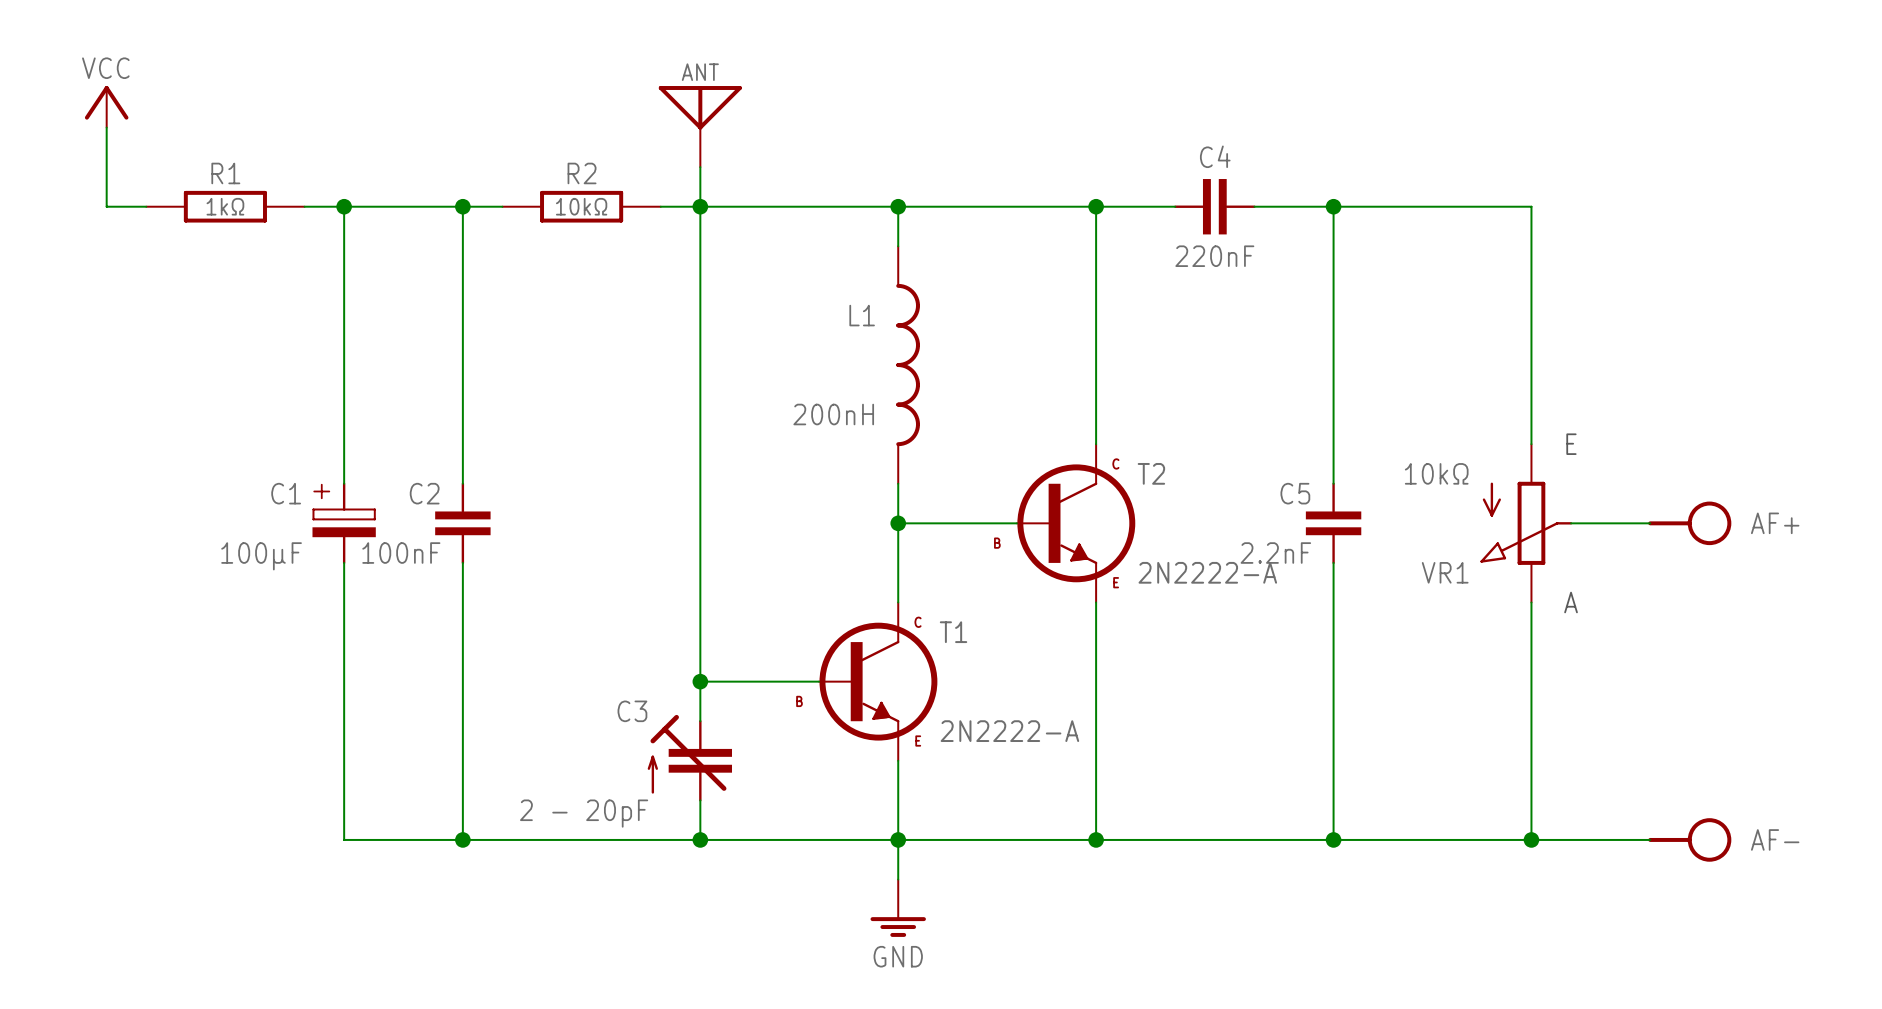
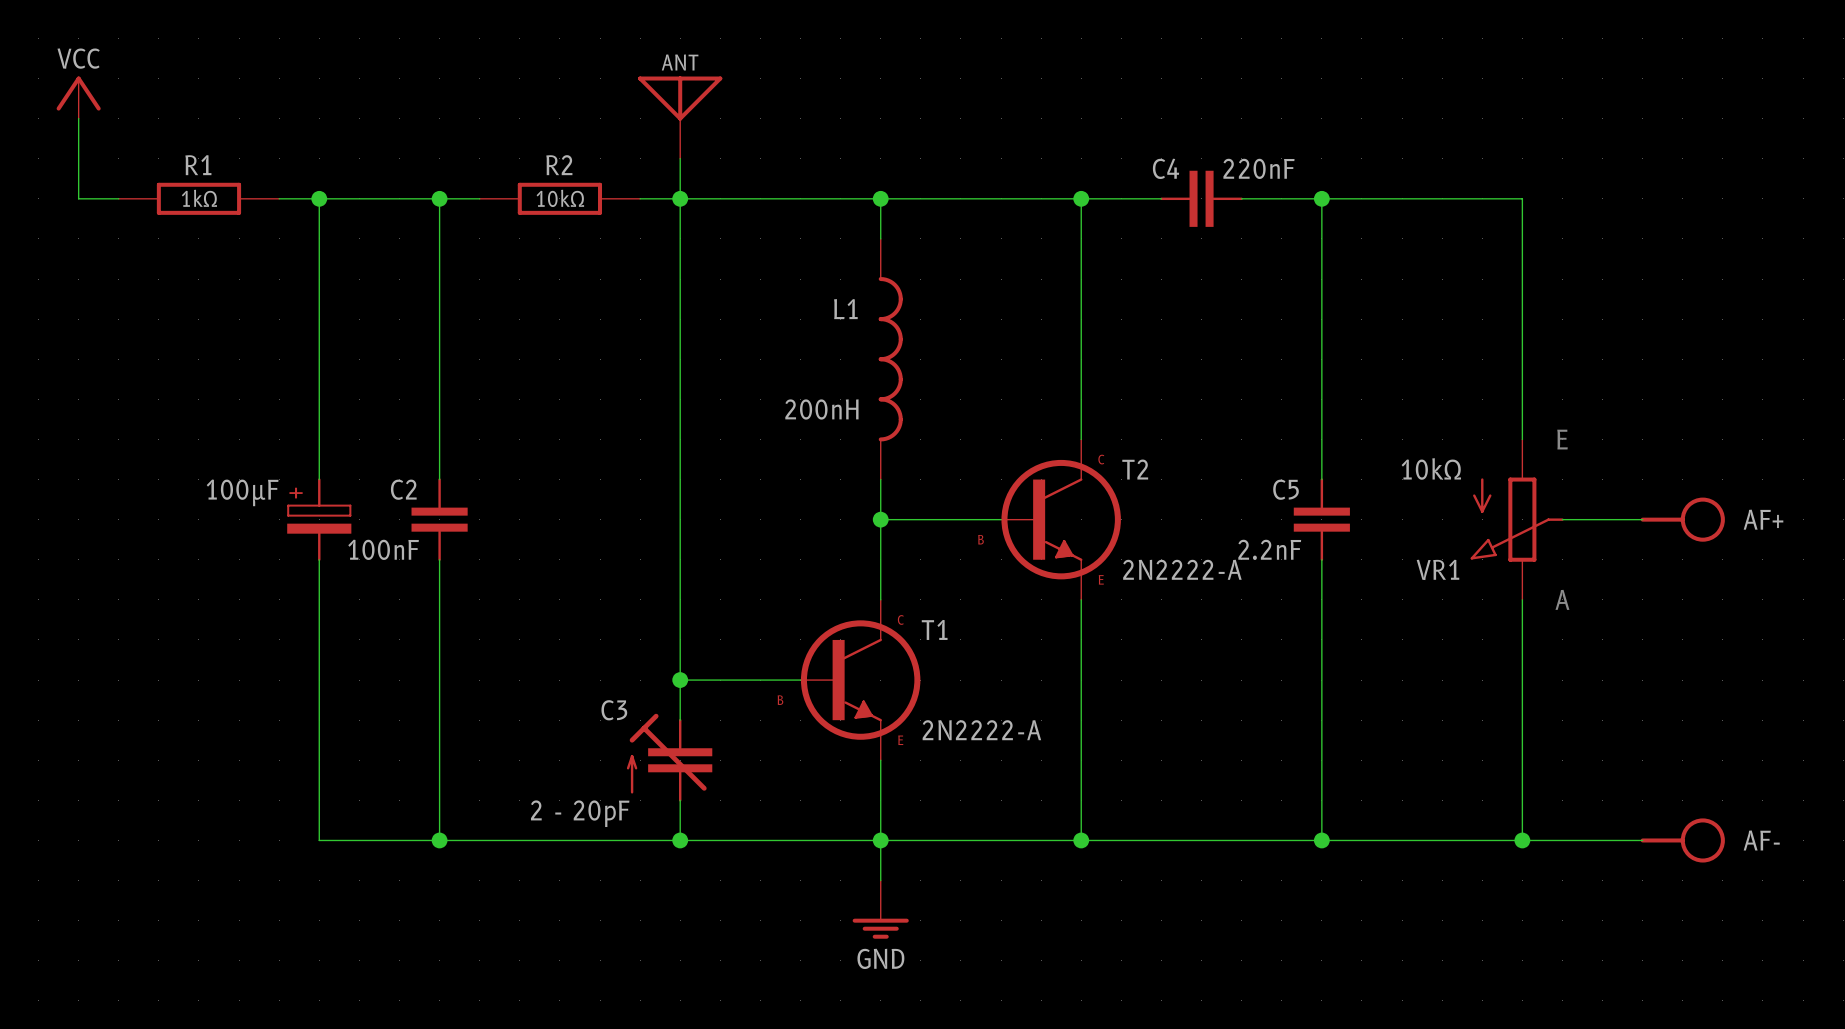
C4 name position: C4 (1215, 156) -> C4 (1166, 168)
C4 value position: 220nF (1214, 256) -> 220nF (1258, 168)
C1 name: C1 (286, 493) -> 100µF (242, 492)
C1 value: 100µF (261, 556) -> none

